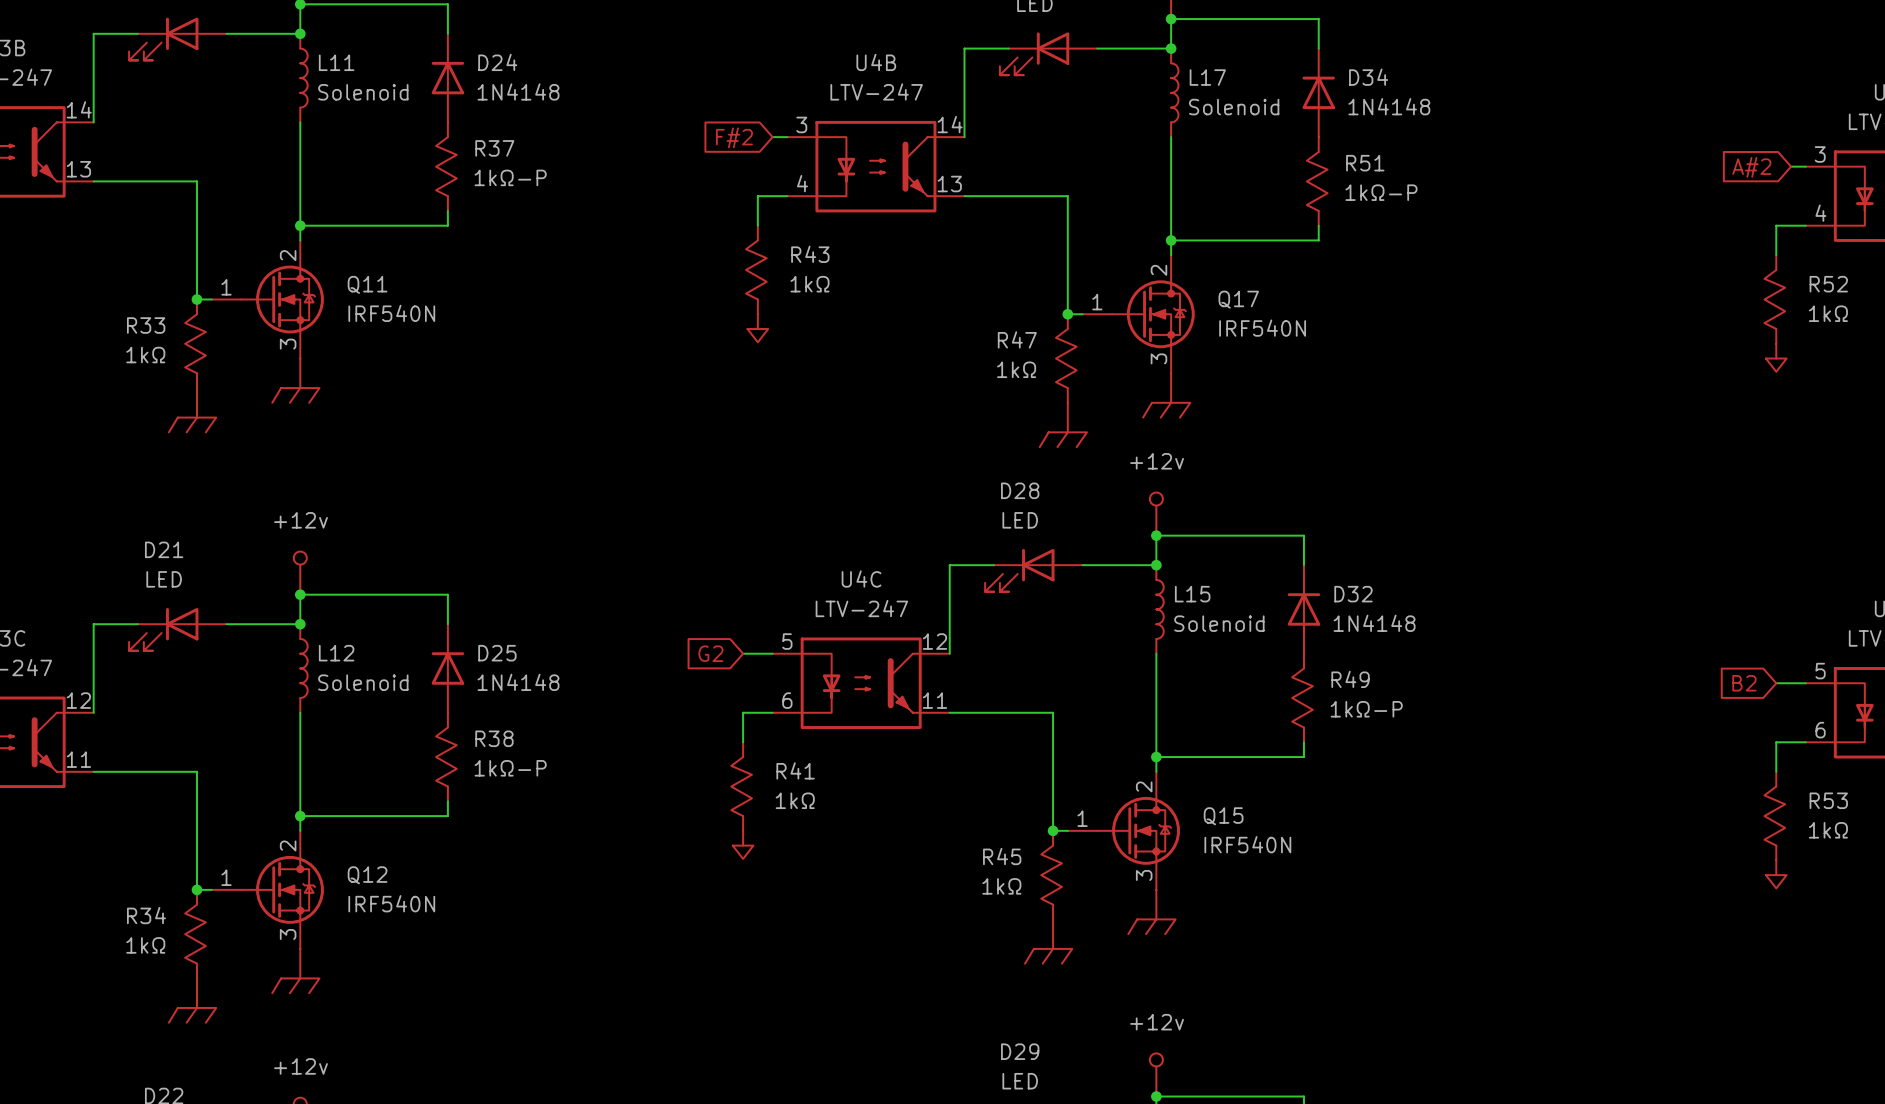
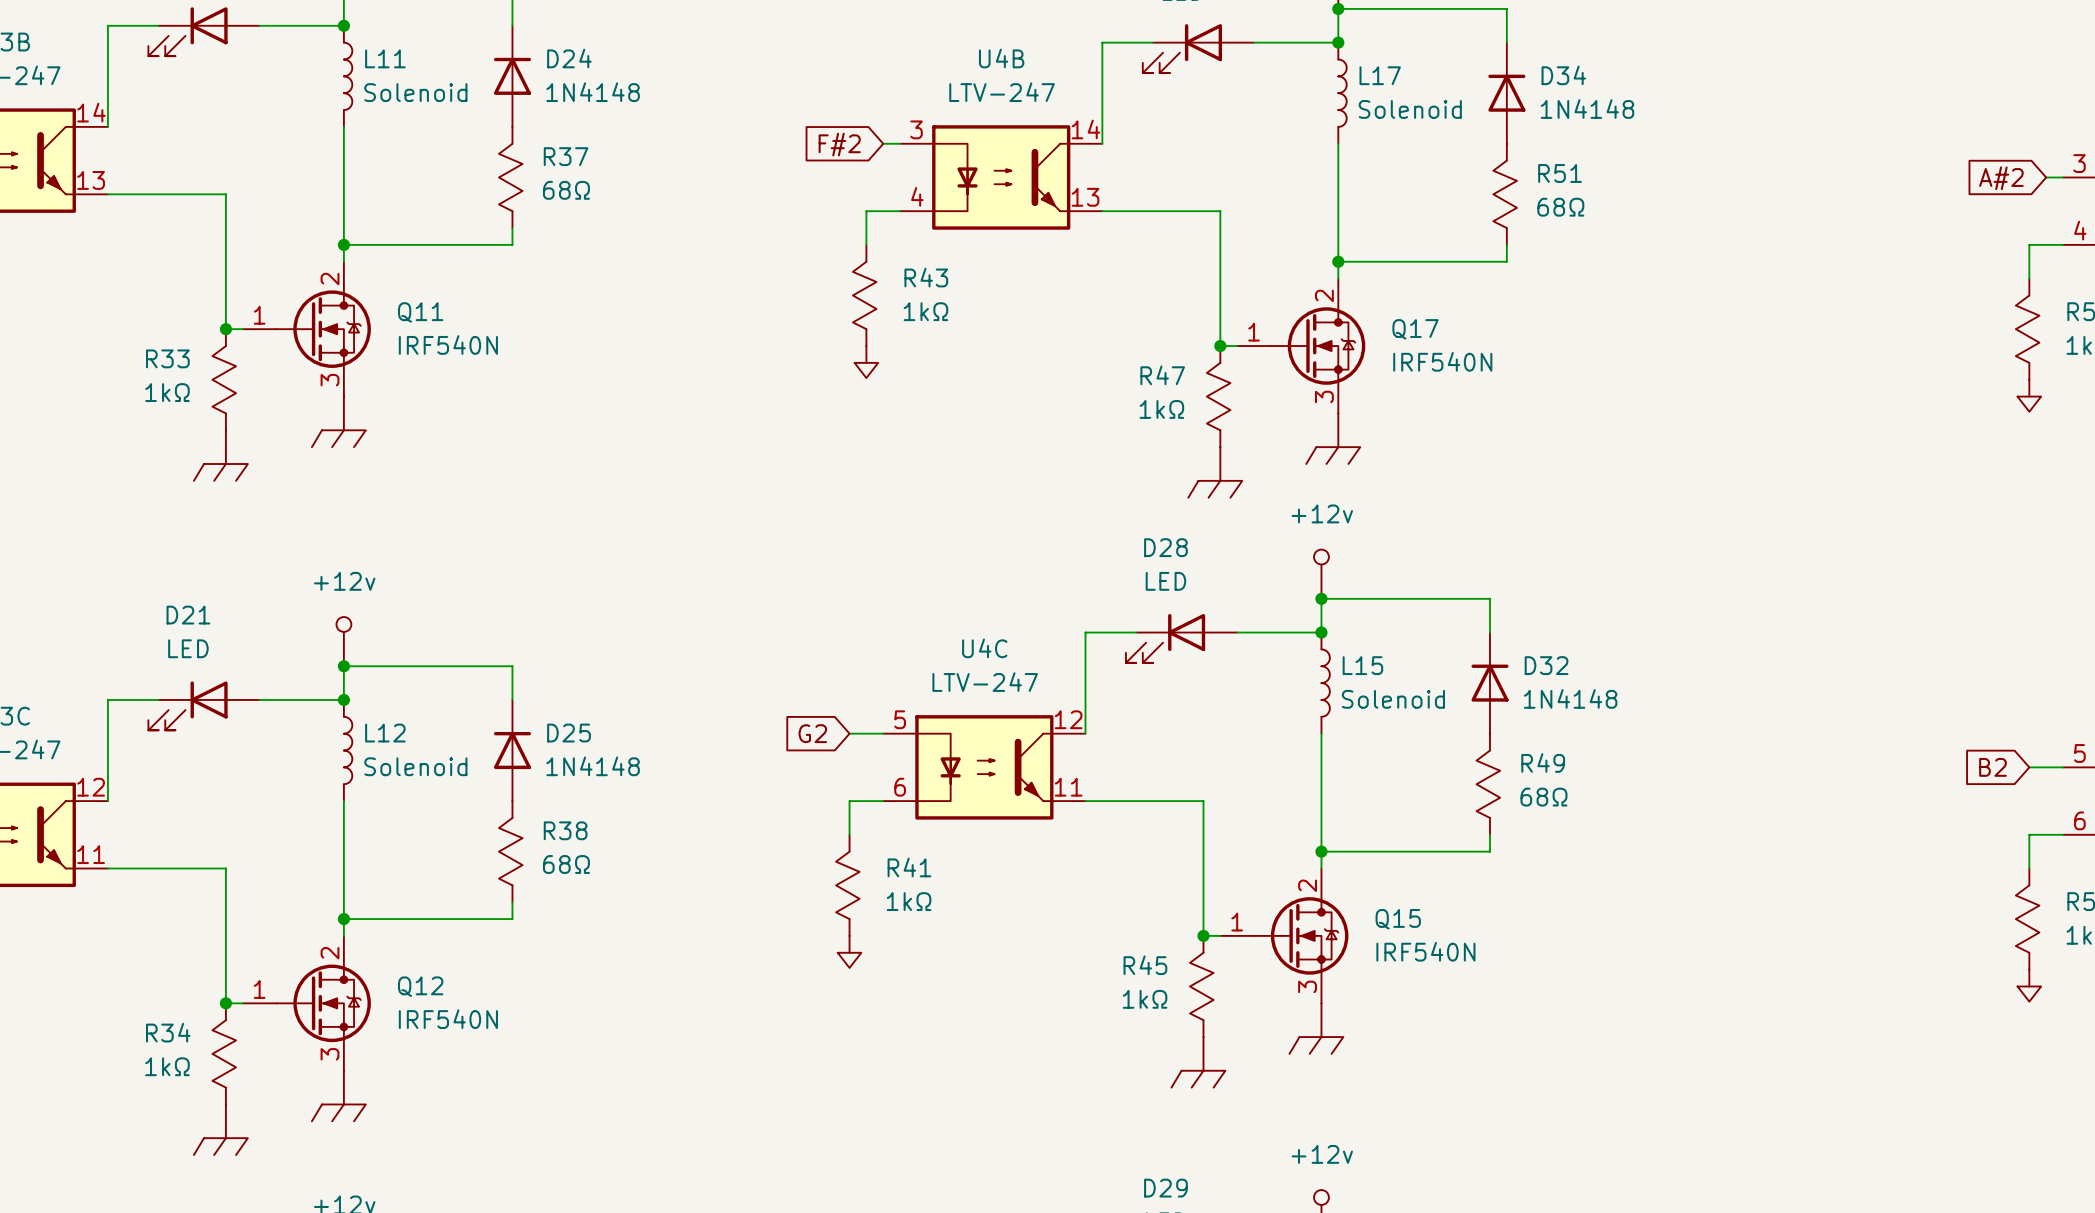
R37 value: 1kΩ-P (510, 177) -> 68Ω (566, 190)
R51 value: 1kΩ-P (1381, 192) -> 68Ω (1560, 207)
R49 value: 1kΩ-P (1366, 709) -> 68Ω (1543, 797)
R38 value: 1kΩ-P (510, 768) -> 68Ω (566, 864)

